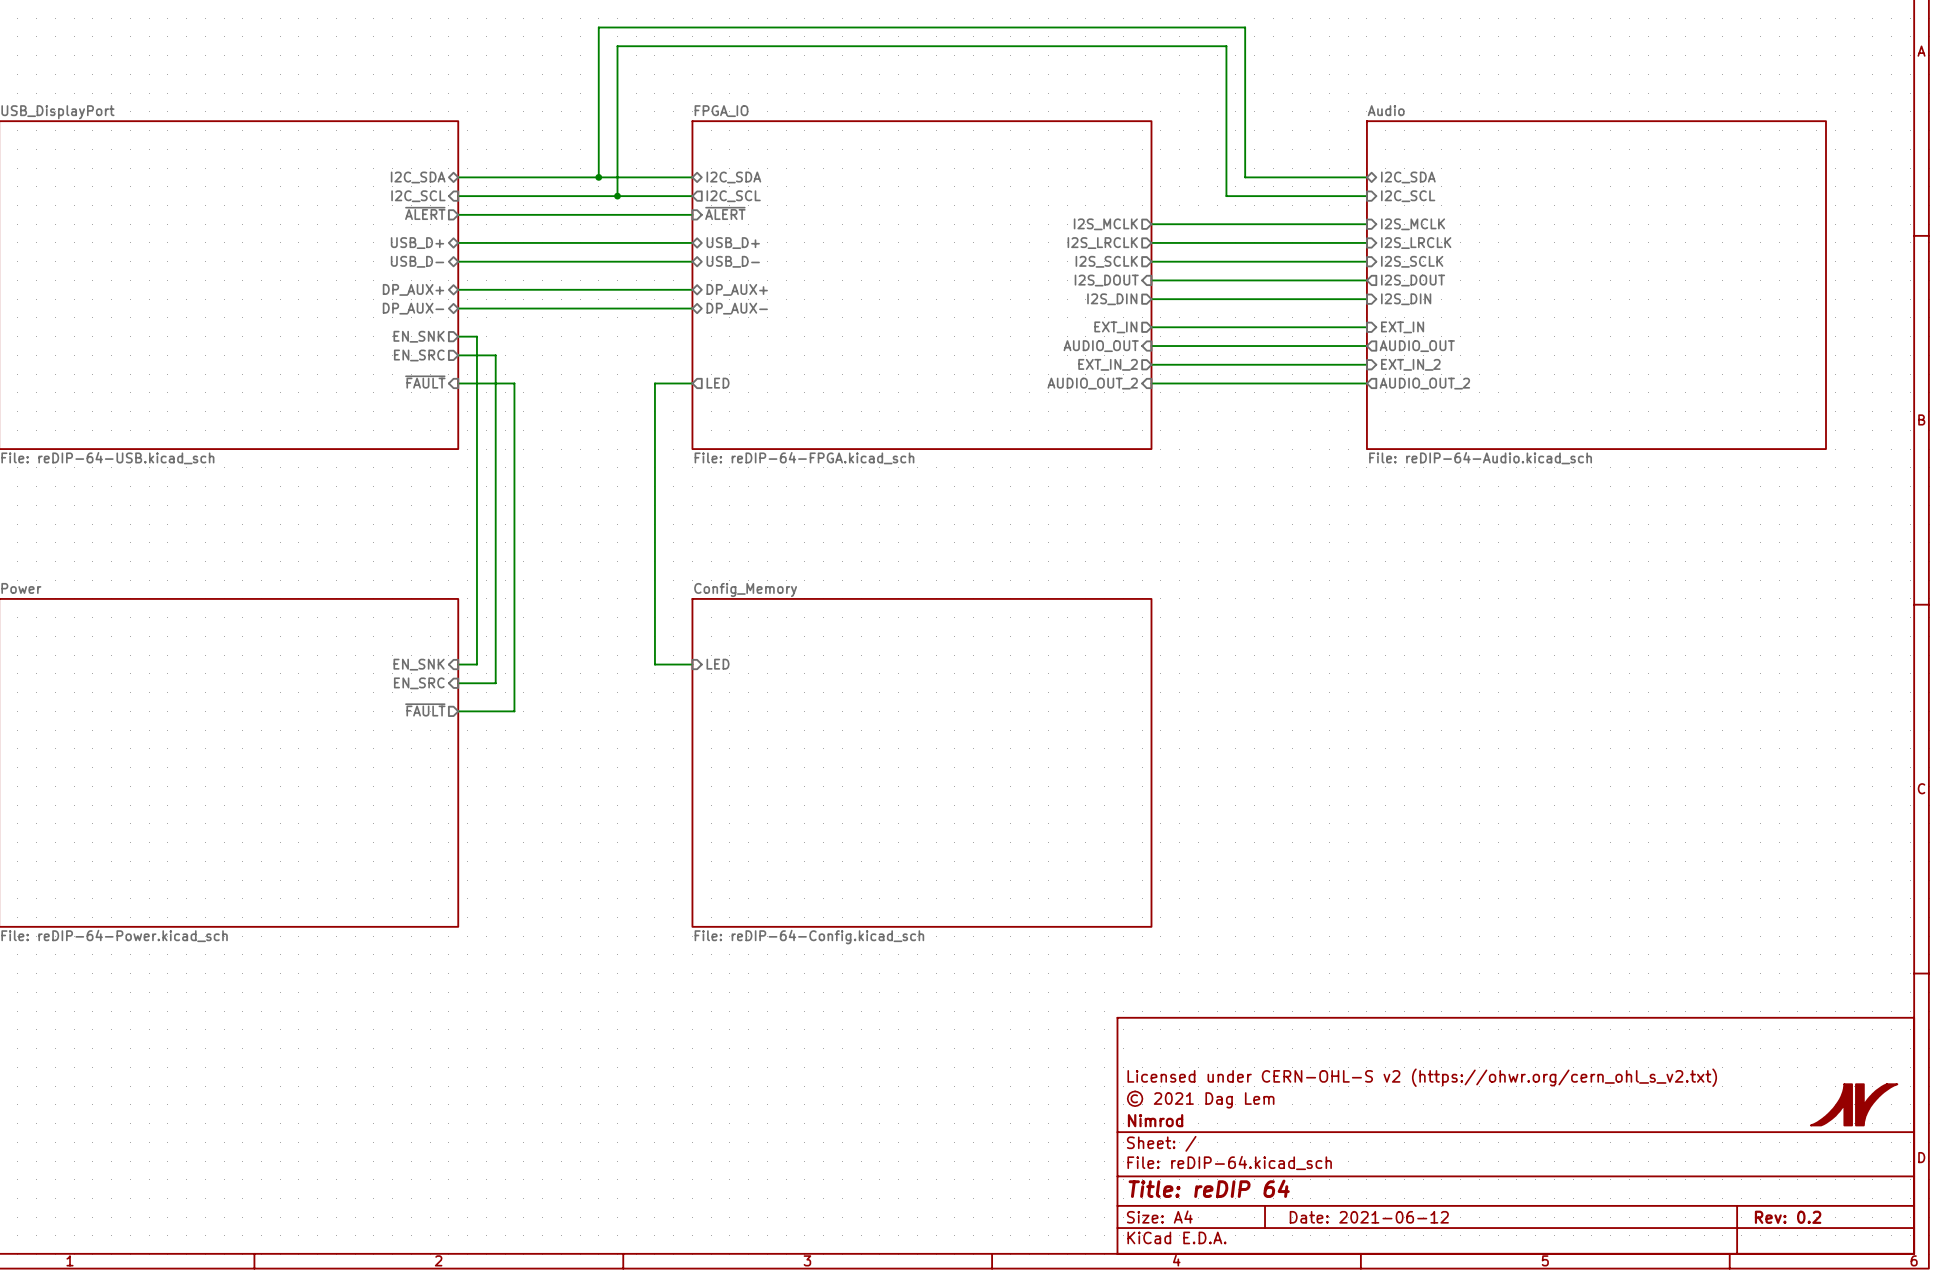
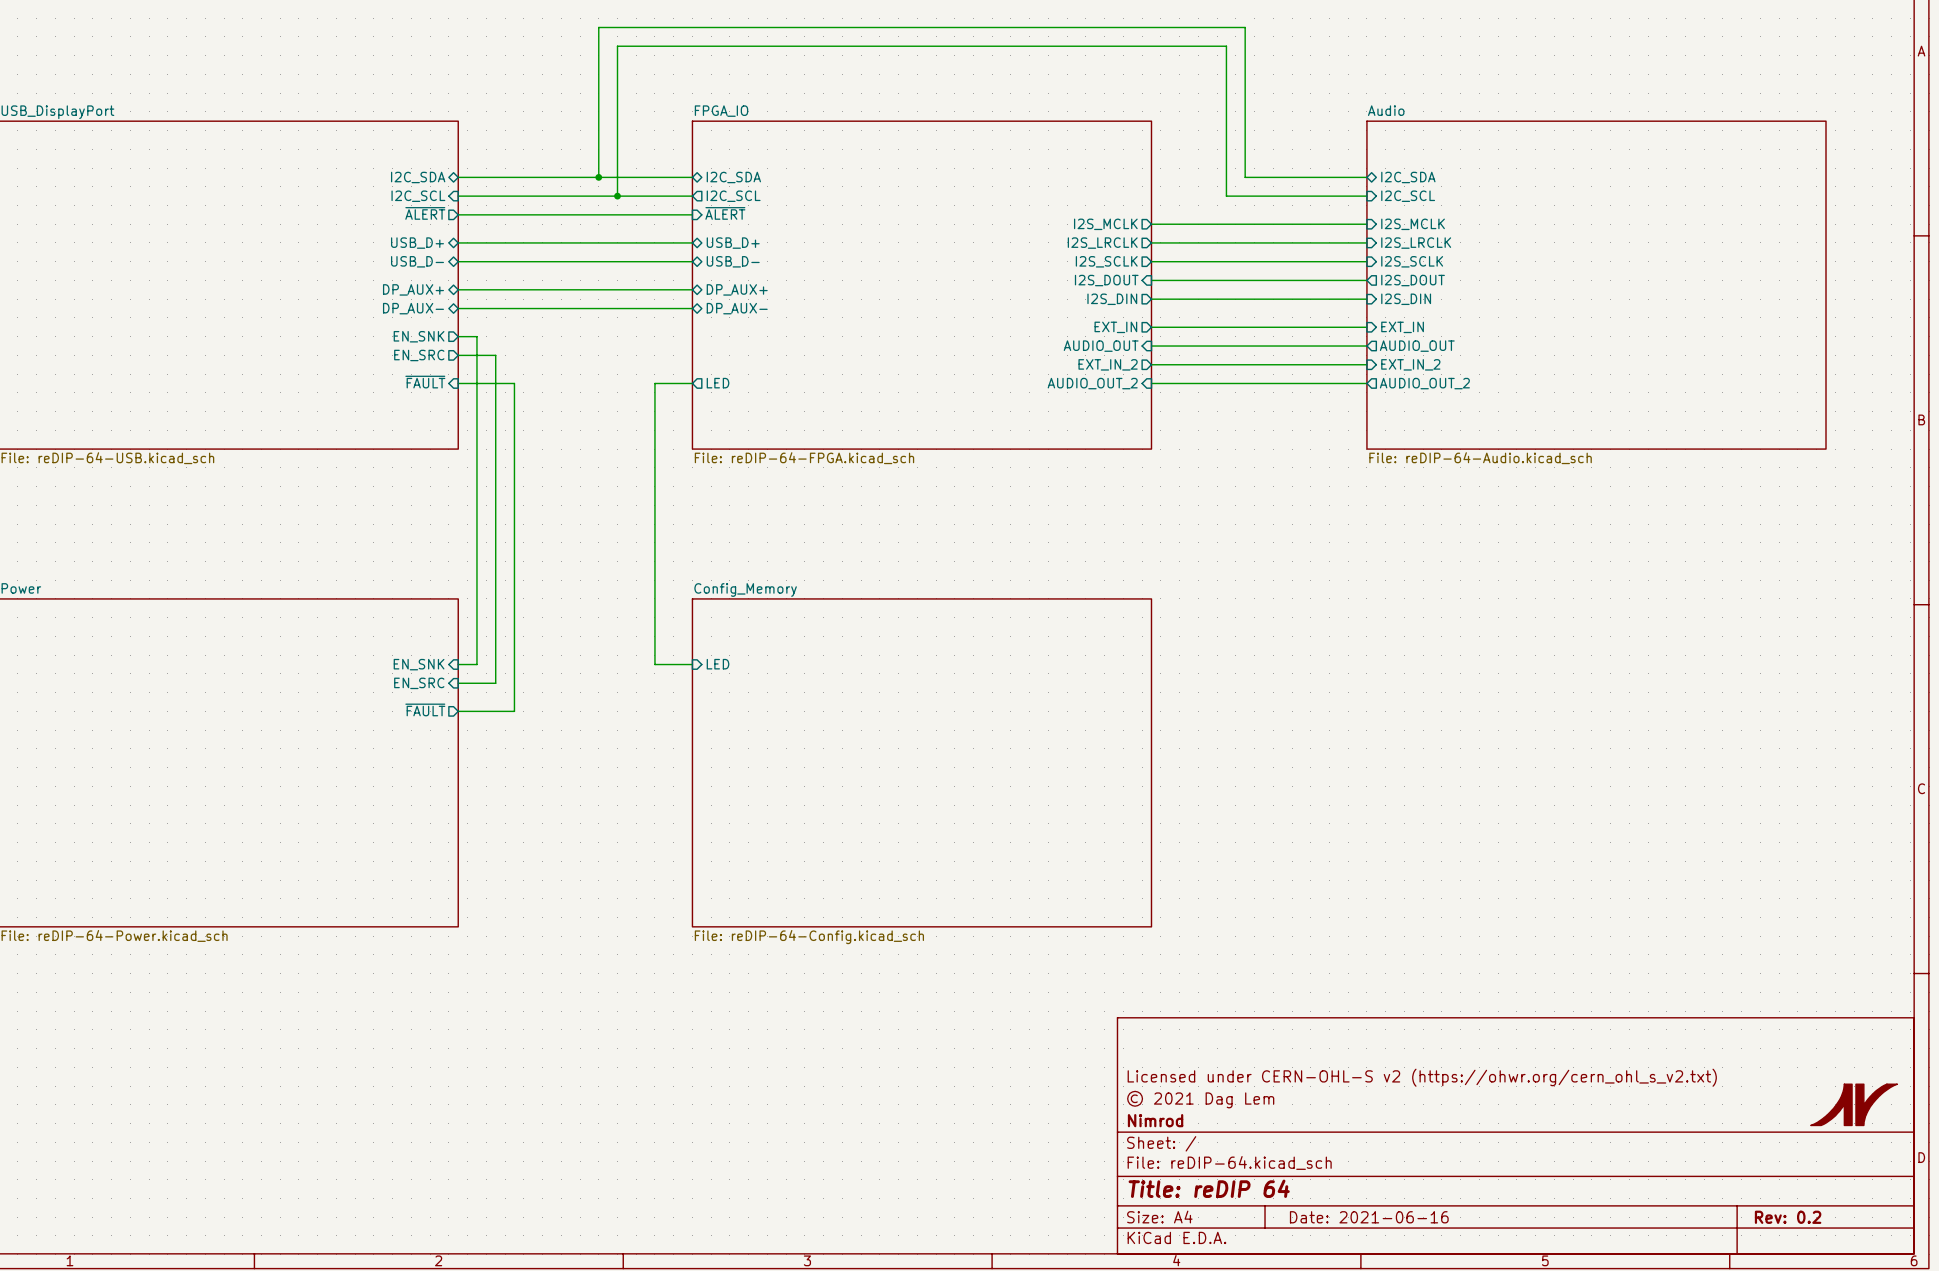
title block: Date: 2021-06-12 (1369, 1217) -> Date: 2021-06-16 (1369, 1217)

